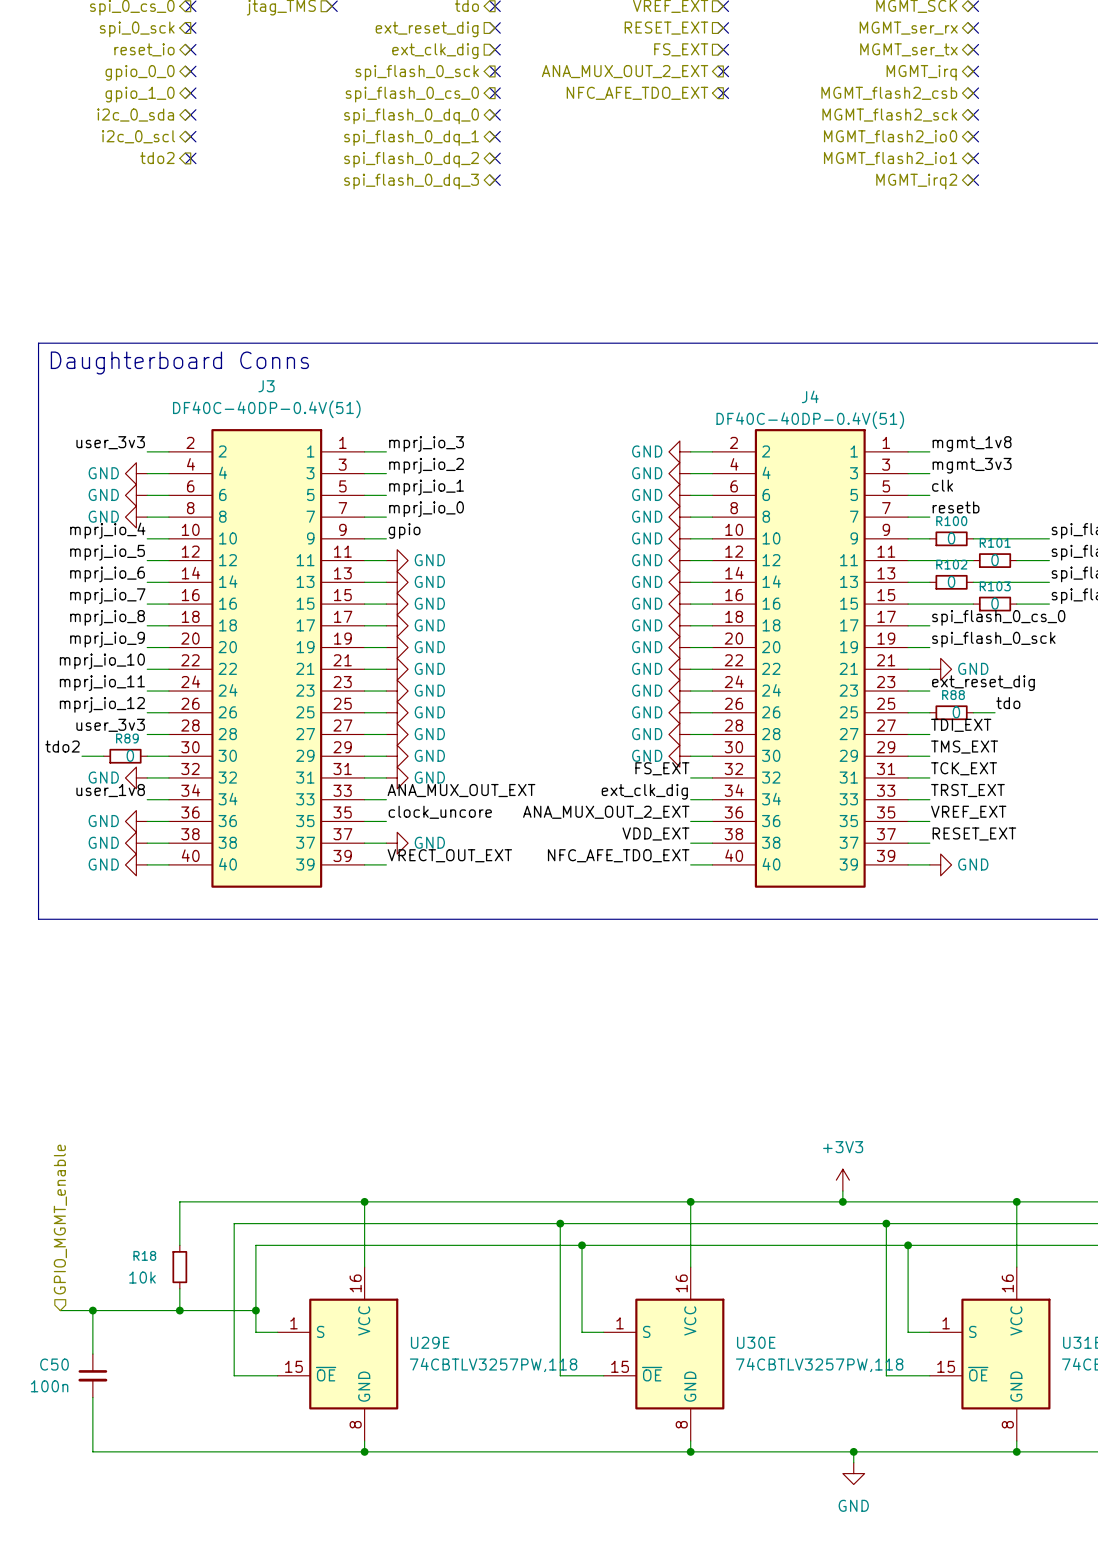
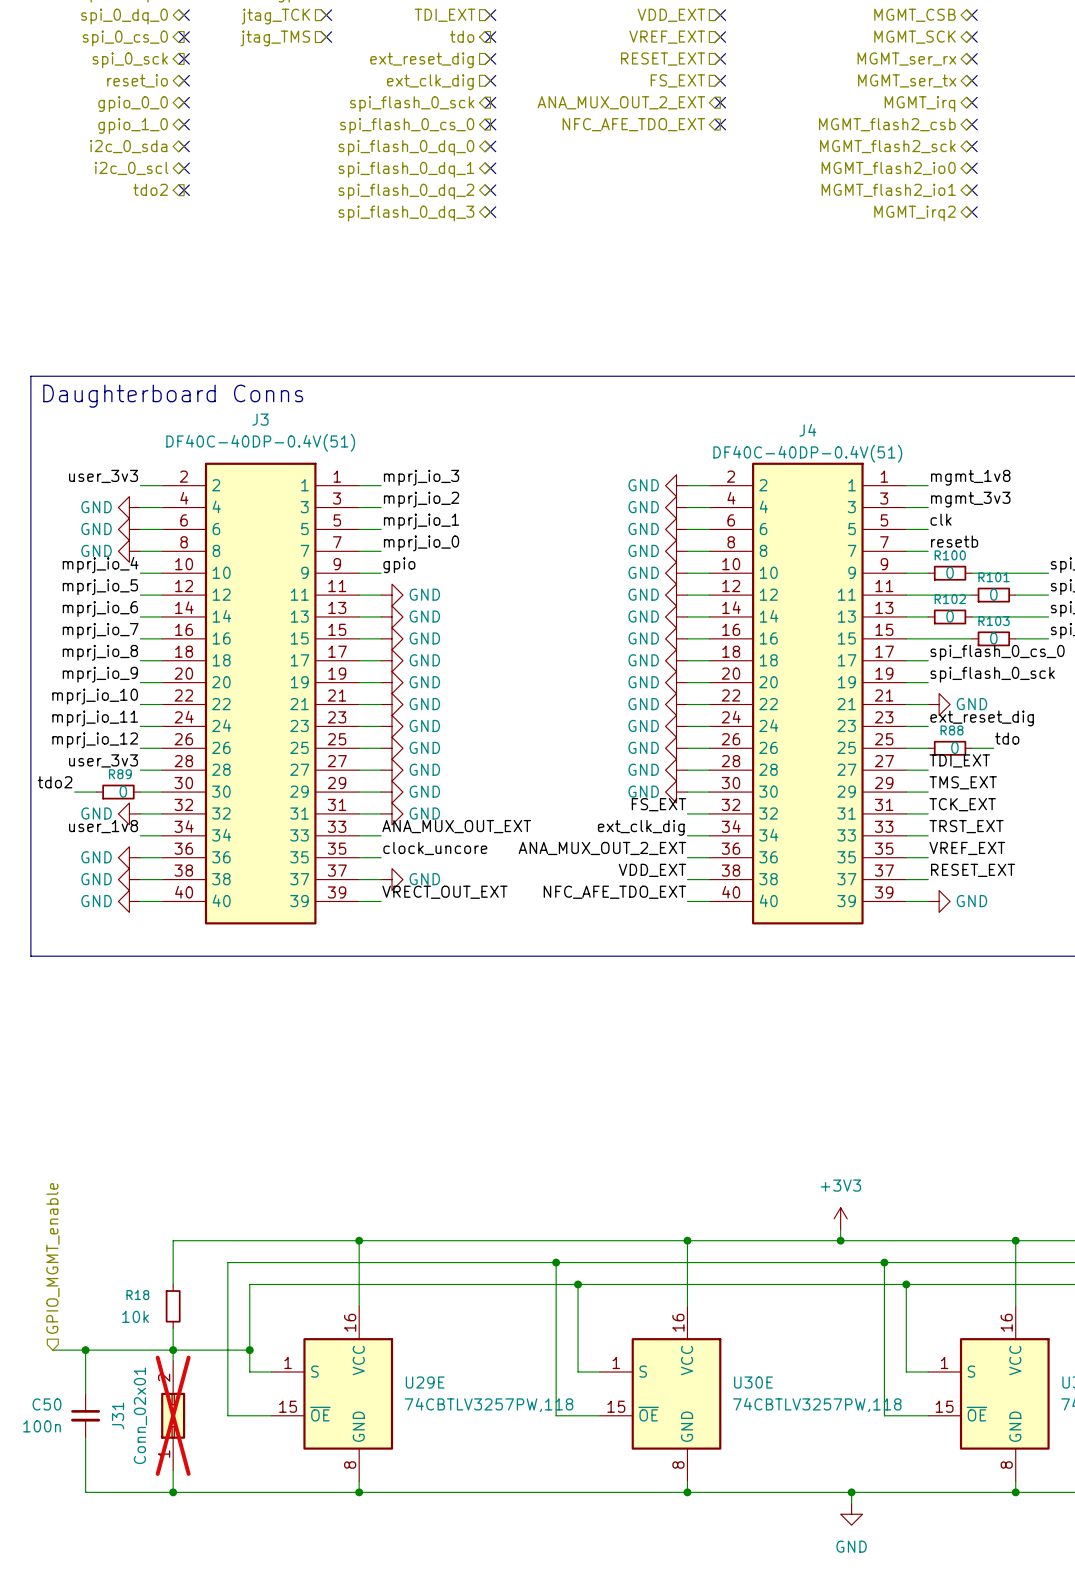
wire: none -> (173, 1350) (173, 1361)
J31: none -> Conn_02x01 (173, 1415)
wire: none -> (173, 1470) (173, 1492)
junction: none -> (173, 1492)

